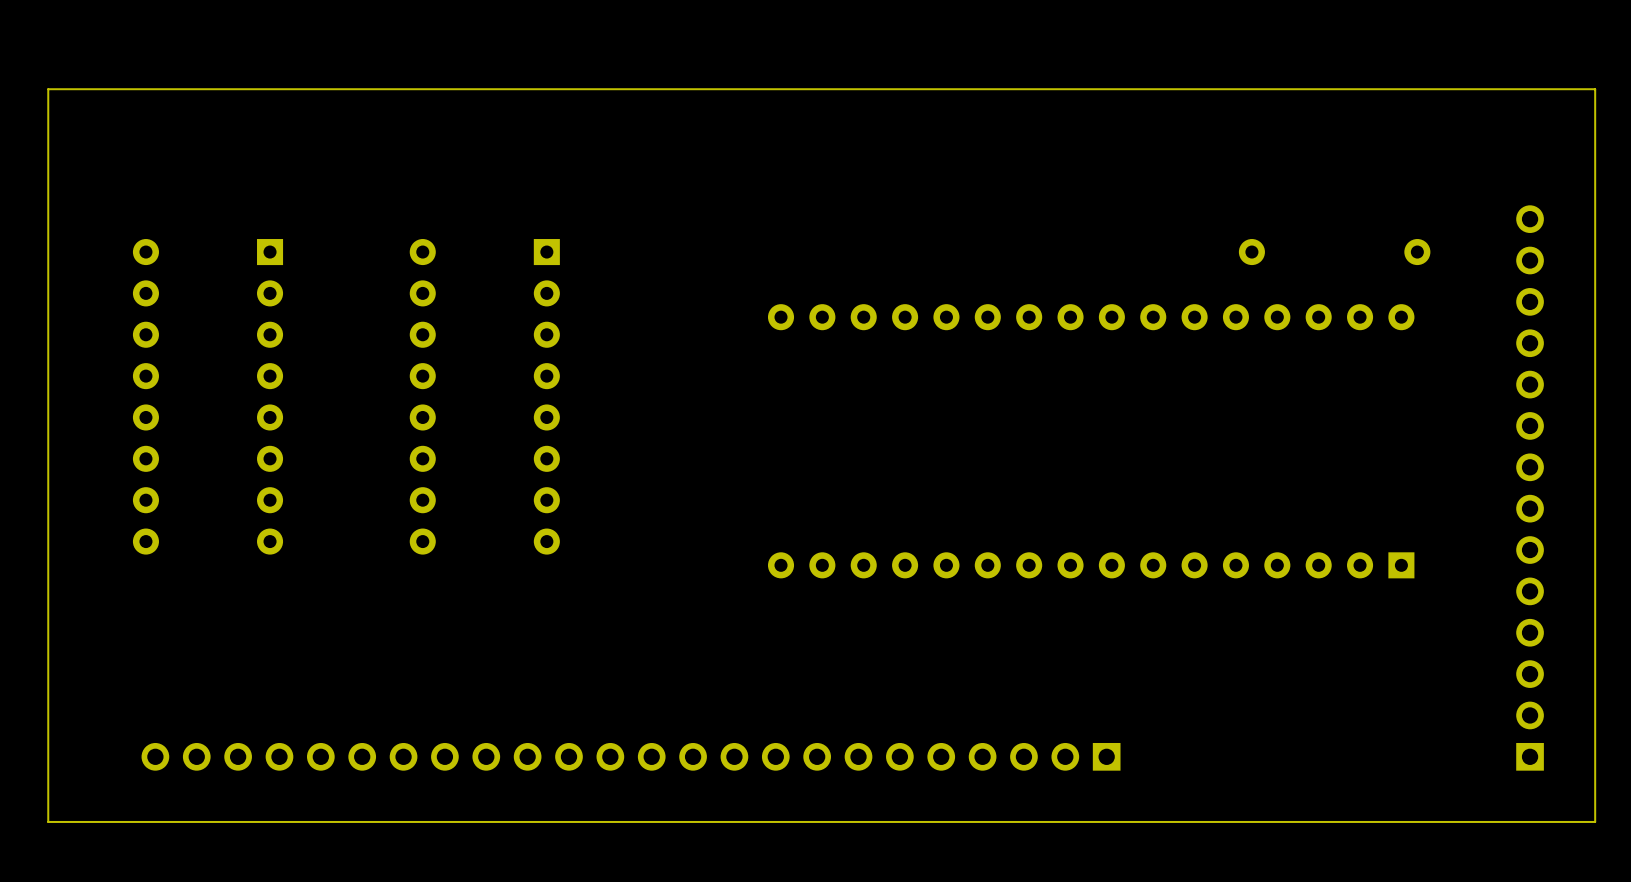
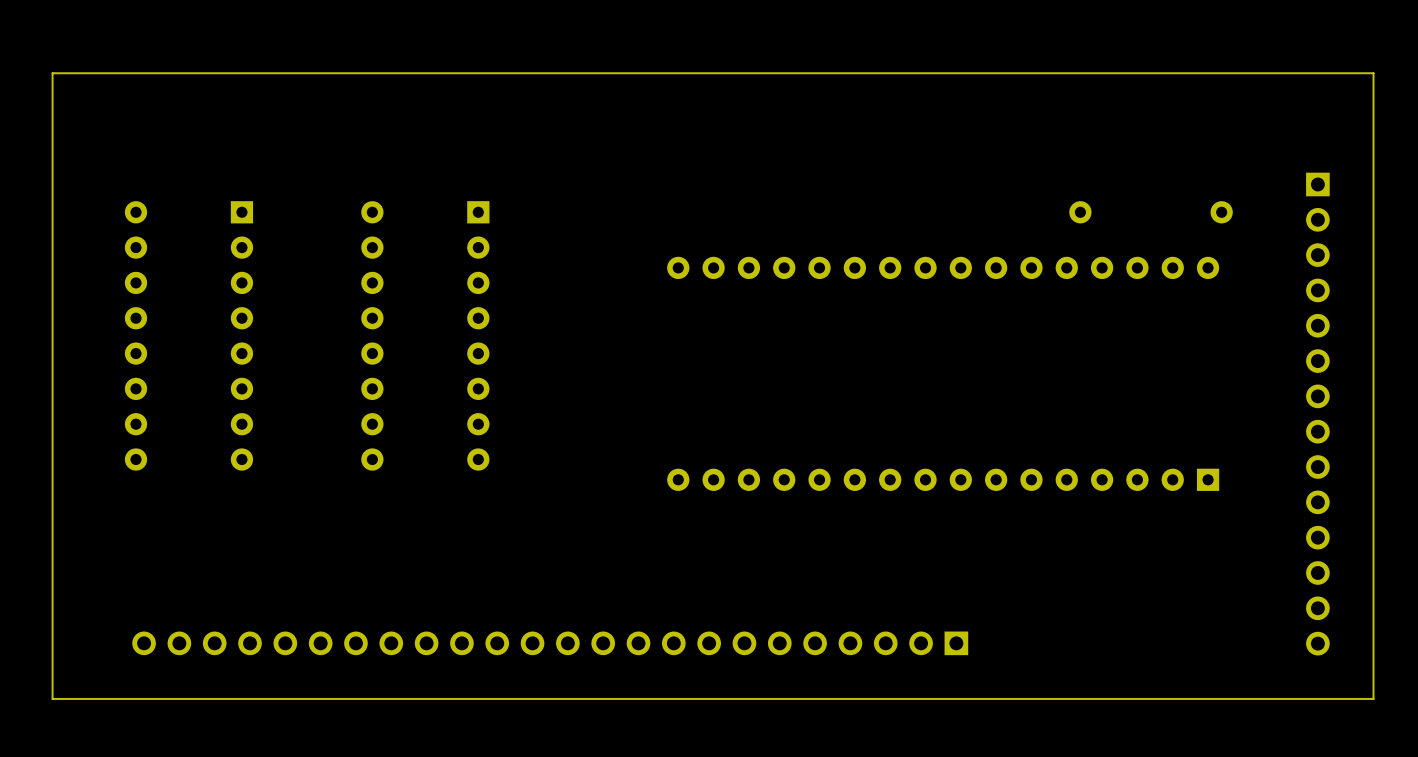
part rotation: 0° (1530, 487) -> 180° (1317, 414)

